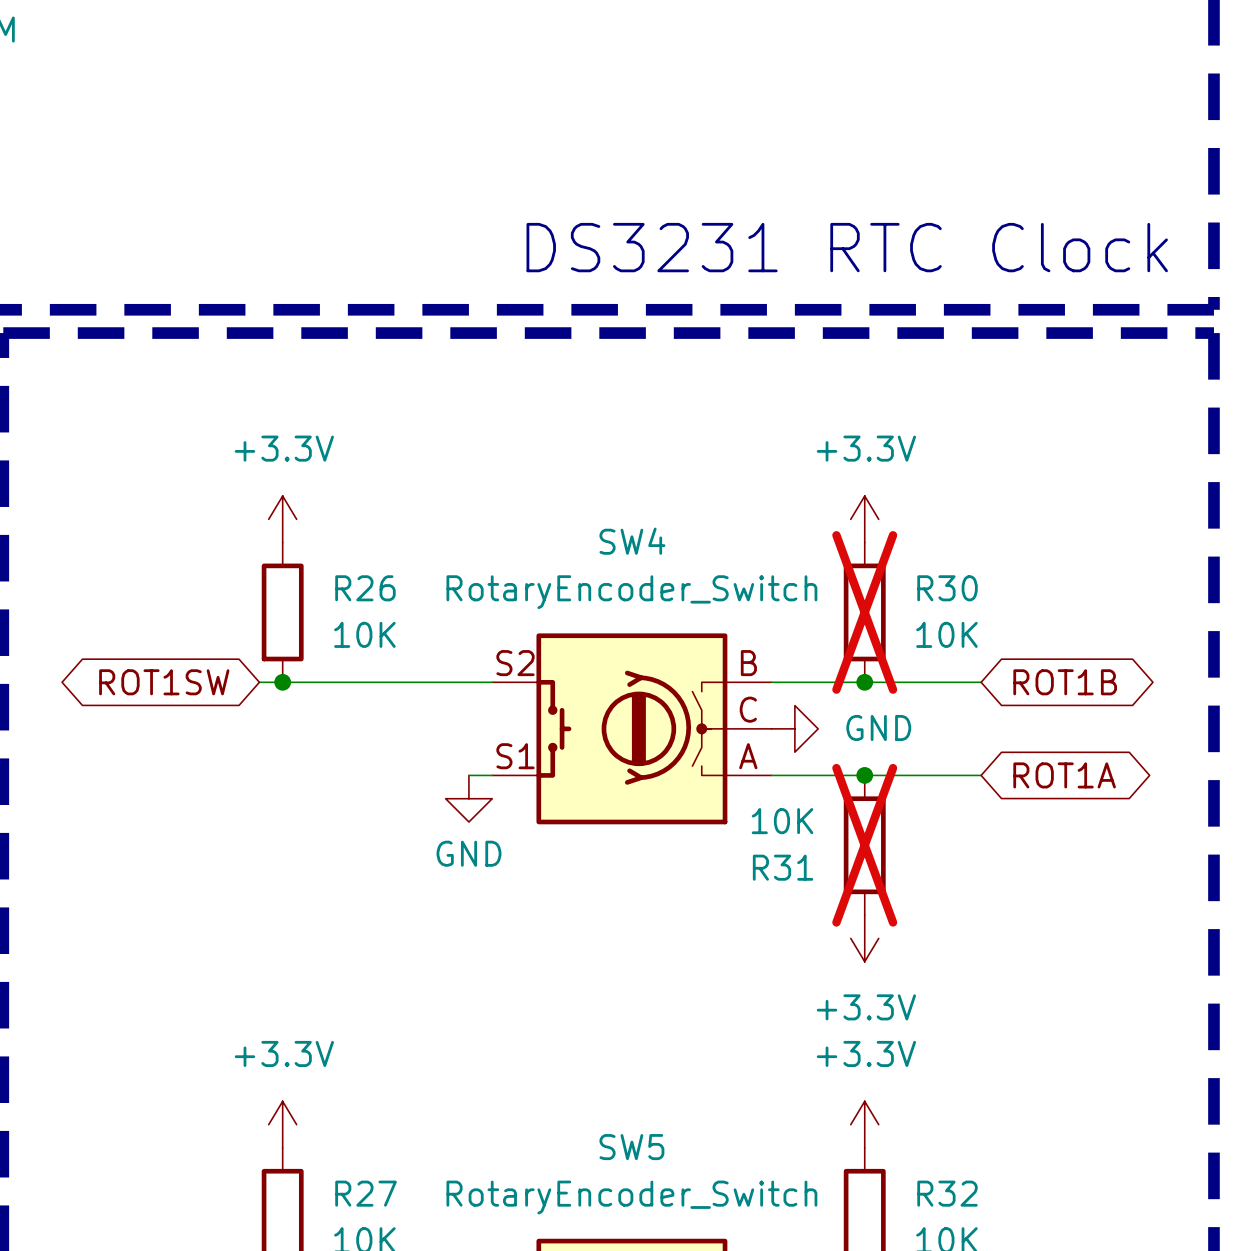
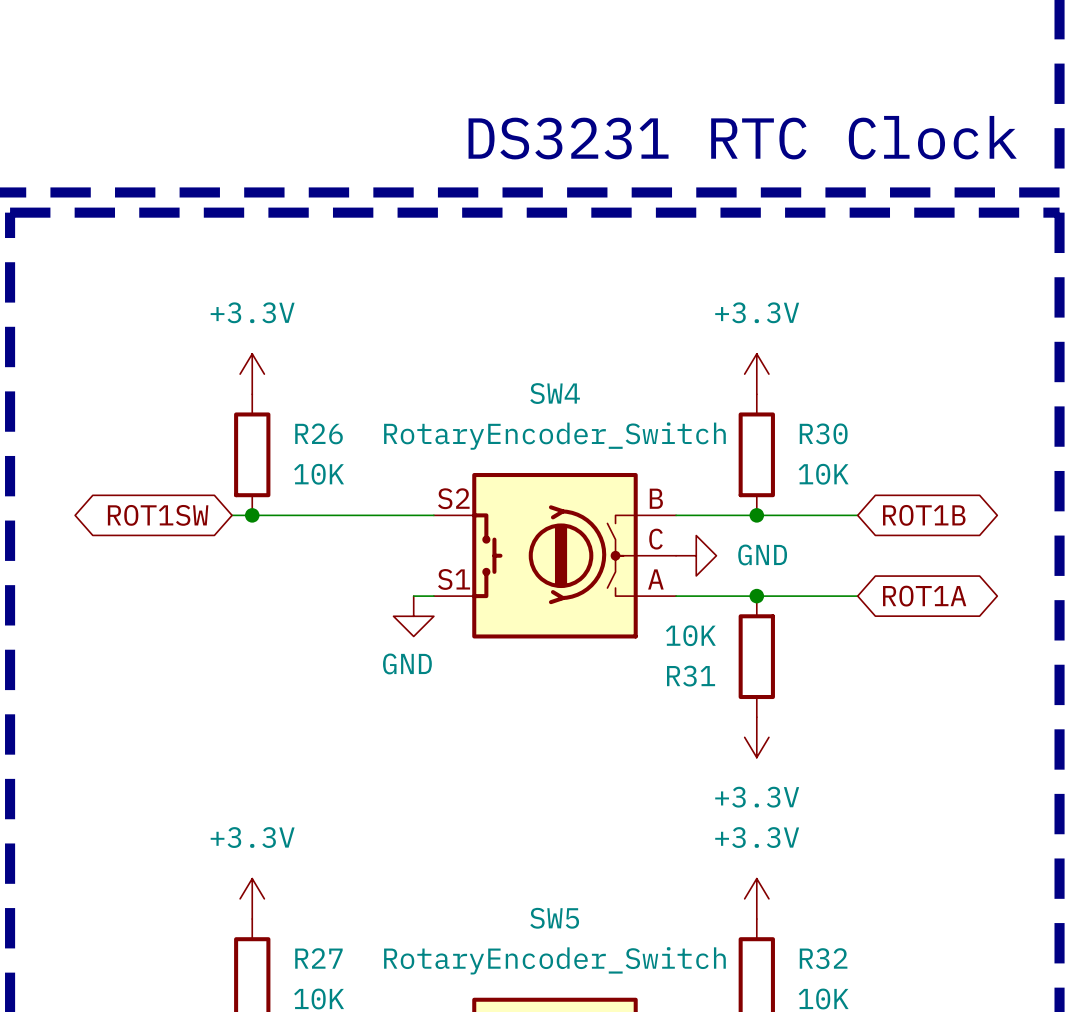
R30 do-not-place cross: (864, 612) -> none
R31 do-not-place cross: (864, 845) -> none

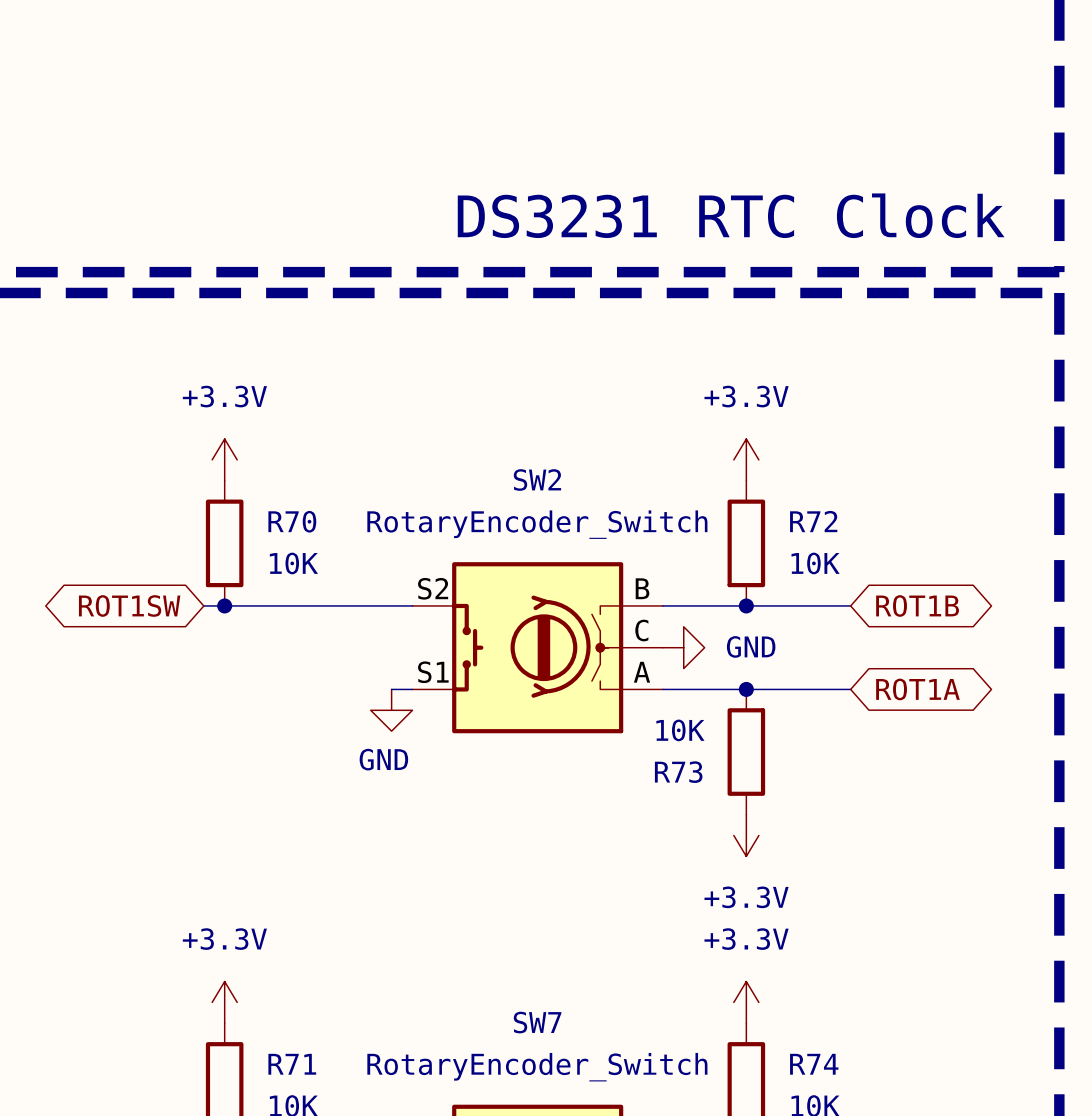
SW4 name: SW4 (555, 393) -> SW2 (537, 480)
R26 name: R26 (319, 433) -> R70 (292, 521)
R30 name: R30 (823, 433) -> R72 (813, 521)
R31 name: R31 (691, 676) -> R73 (678, 772)
SW5 name: SW5 (554, 918) -> SW7 (537, 1022)
R27 name: R27 (318, 958) -> R71 (292, 1064)
R32 name: R32 (823, 958) -> R74 (814, 1064)

